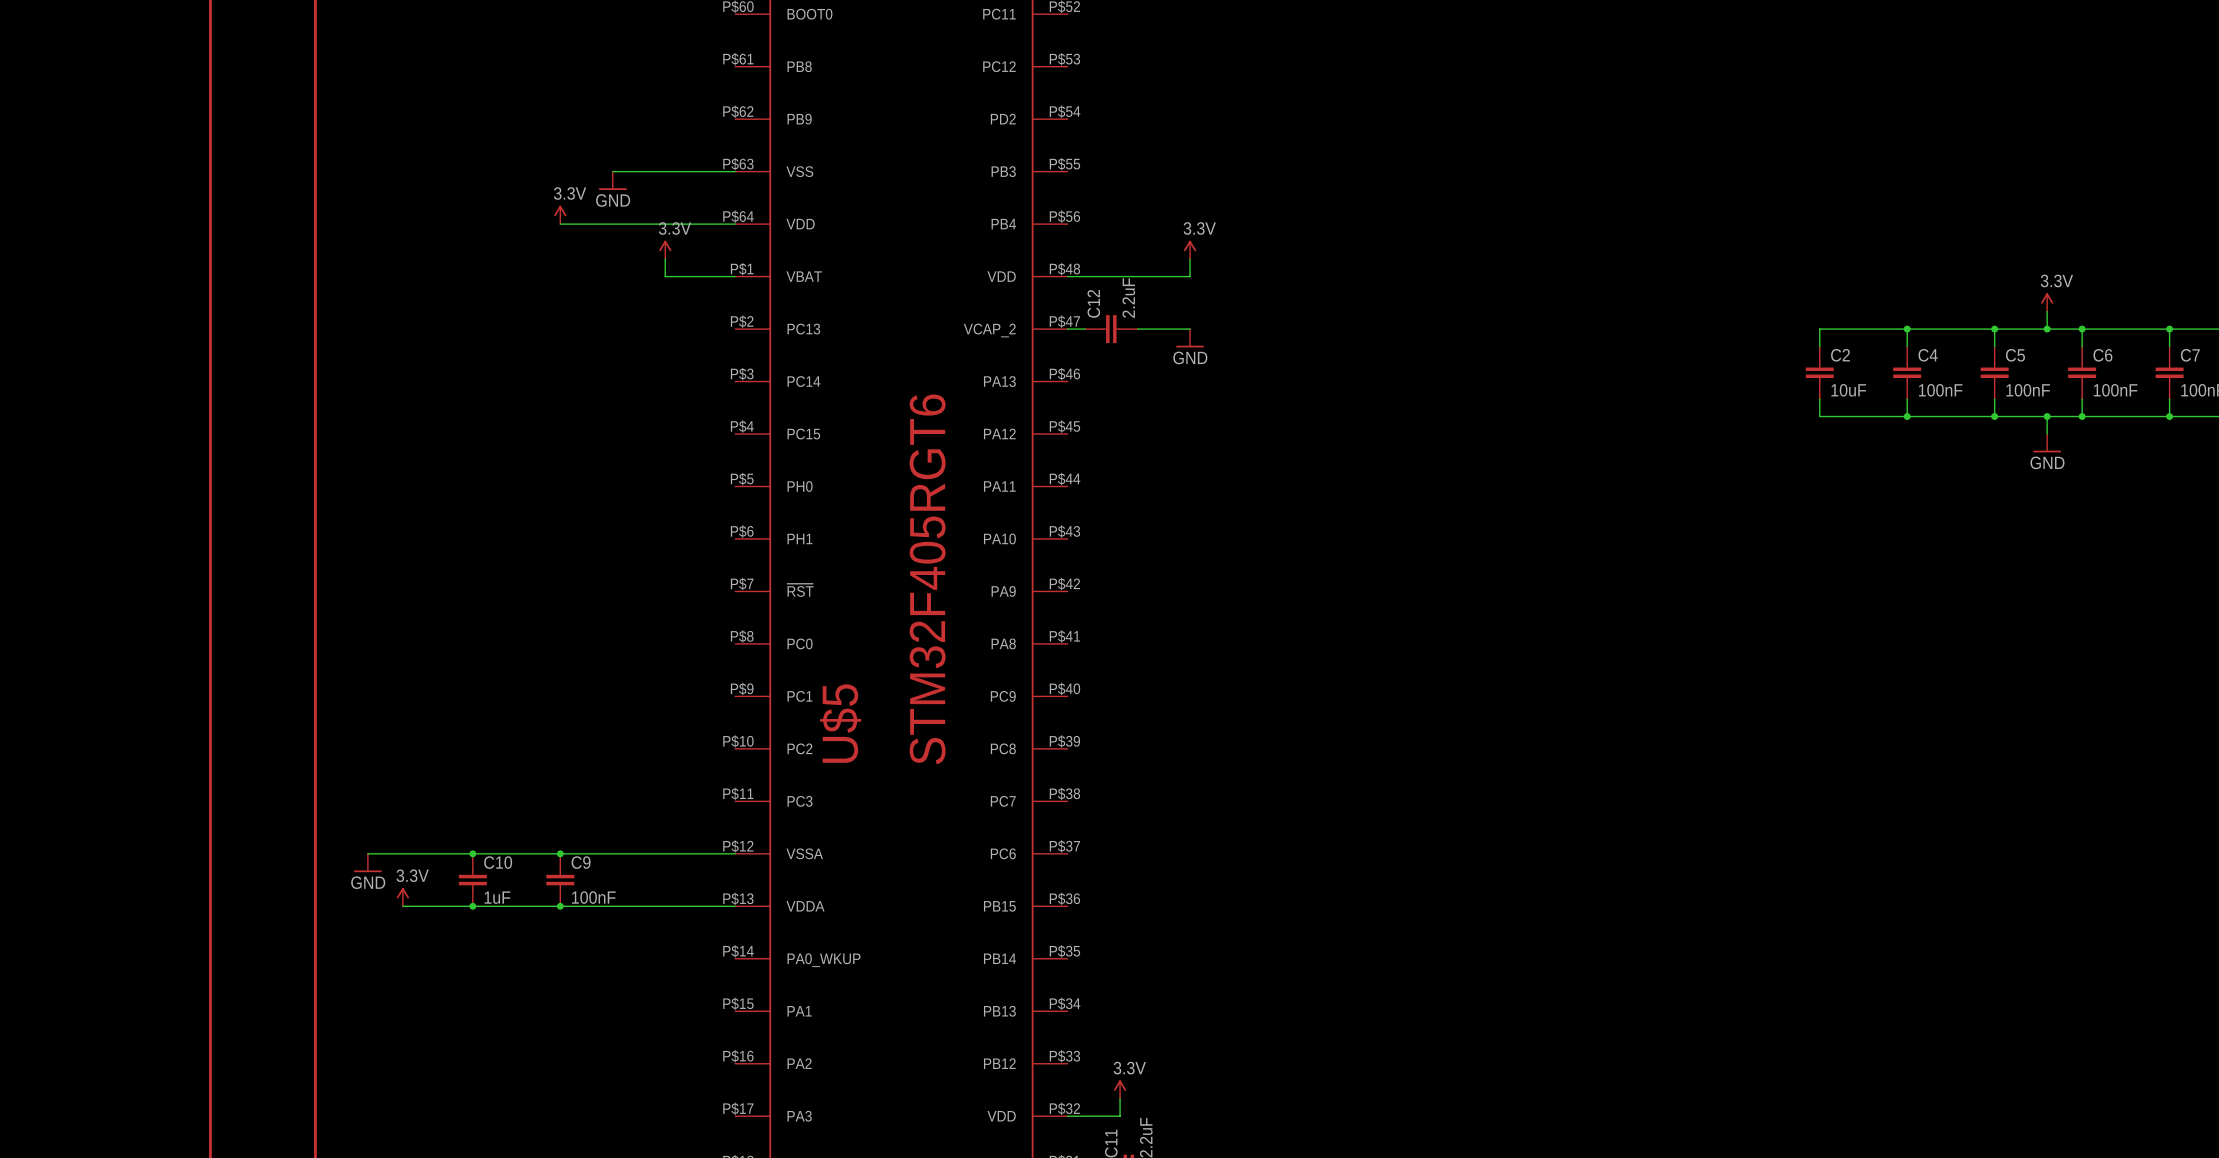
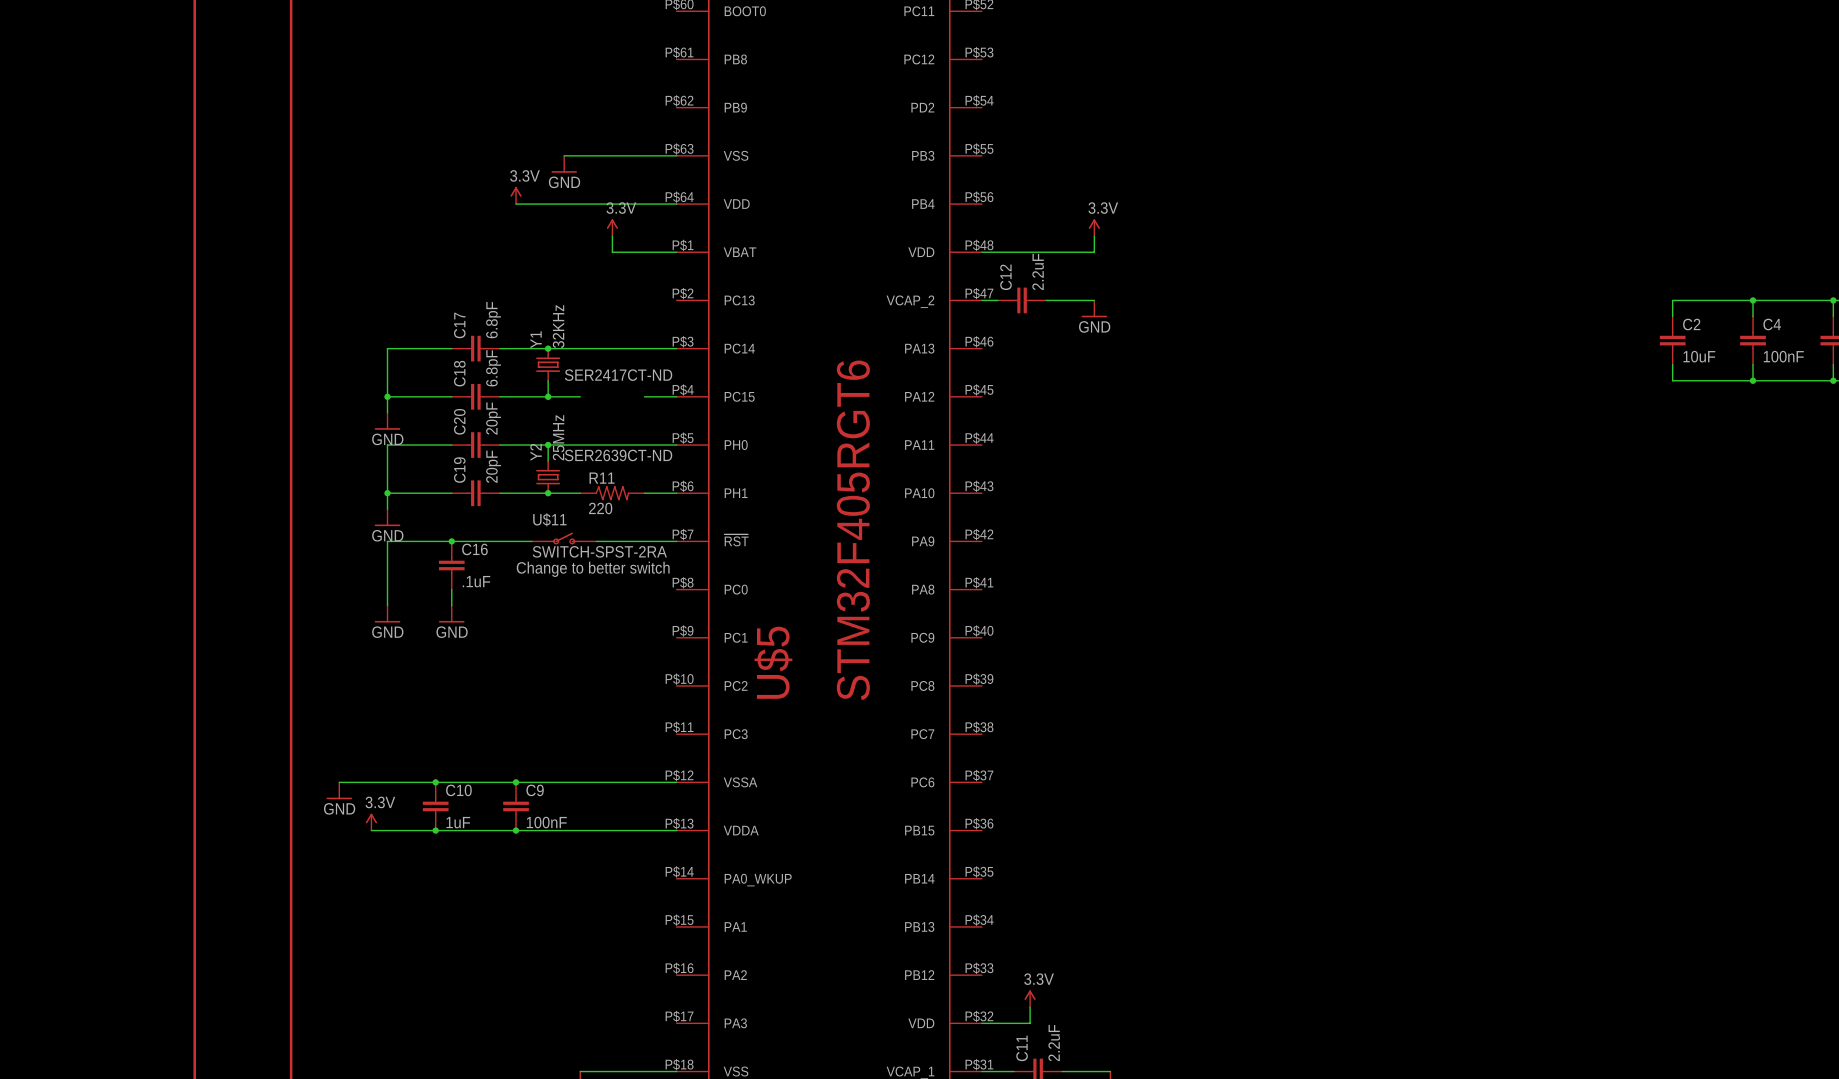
wire: none -> (451, 348) (387, 348) (387, 412)
C17: none -> 6.8pF (475, 348)
wire: none -> (499, 348) (676, 348)
junction: none -> (548, 348)
Y1: none -> 32KHz (548, 364)
text: none -> SER2417CT-ND (618, 375)
wire: none -> (548, 380) (548, 396)
wire: none -> (387, 396) (451, 396)
junction: none -> (387, 396)
C18: none -> 6.8pF (475, 396)
wire: none -> (499, 396) (580, 396)
junction: none -> (548, 396)
wire: none -> (644, 396) (676, 396)
power symbol: none -> GND (387, 421)
wire: none -> (451, 445) (387, 445) (387, 509)
C20: none -> 20pF (475, 445)
wire: none -> (499, 445) (676, 445)
wire: none -> (548, 445) (548, 461)
junction: none -> (548, 445)
text: none -> SER2639CT-ND (618, 455)
Y2: none -> 25MHz (548, 477)
wire: none -> (387, 493) (451, 493)
junction: none -> (387, 493)
C19: none -> 20pF (475, 493)
wire: none -> (499, 493) (580, 493)
junction: none -> (548, 493)
R11: none -> 220 (612, 493)
wire: none -> (644, 493) (676, 493)
power symbol: none -> GND (387, 517)
U$11: none -> SWITCH-SPST-2RA (564, 538)
junction: none -> (451, 541)
wire: none -> (532, 541) (387, 541) (387, 605)
wire: none -> (596, 541) (676, 541)
C16: none -> .1uF (451, 565)
text: none -> Change to better switch (593, 569)
wire: none -> (451, 589) (451, 605)
power symbol: none -> GND (387, 614)
power symbol: none -> GND (451, 614)

